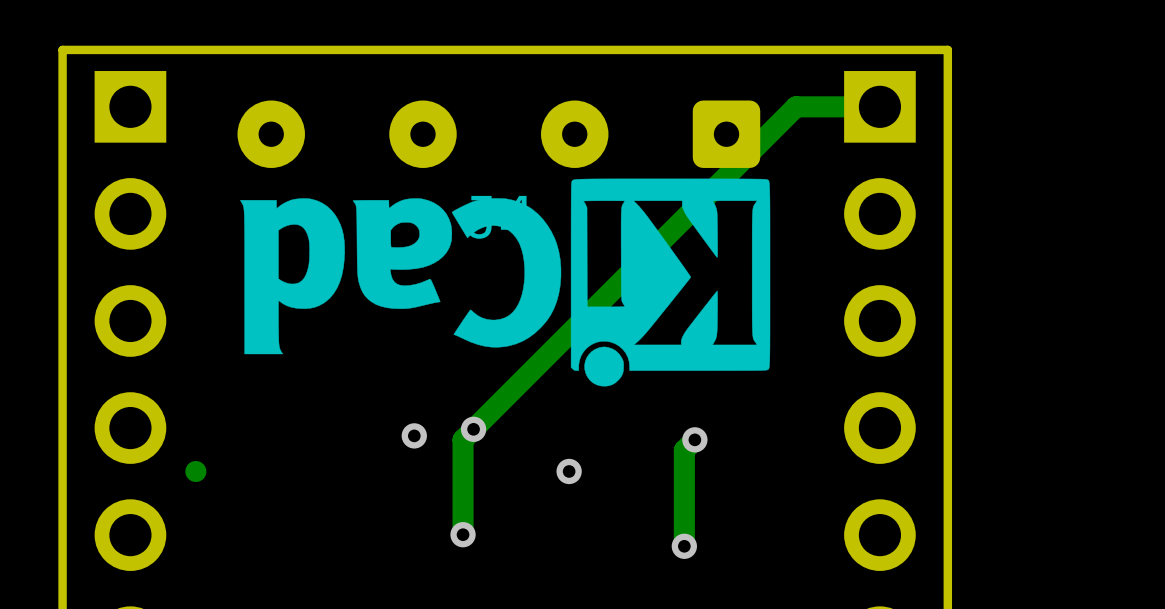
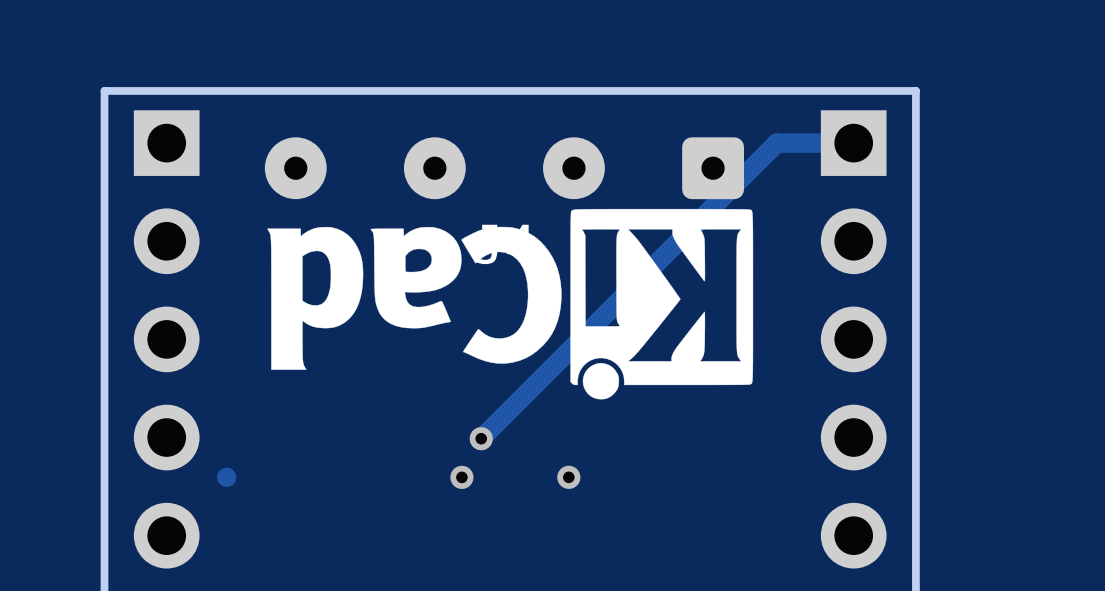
track: (473, 429) (463, 439) (463, 534) -> none
via: (414, 435) -> none
track: (694, 439) (684, 450) (684, 546) -> none
via: (694, 439) -> none
via: none -> (461, 477)
via: (463, 534) -> none
via: (684, 546) -> none

